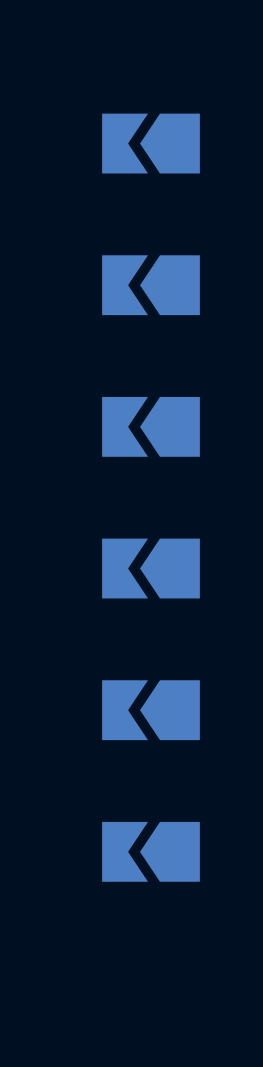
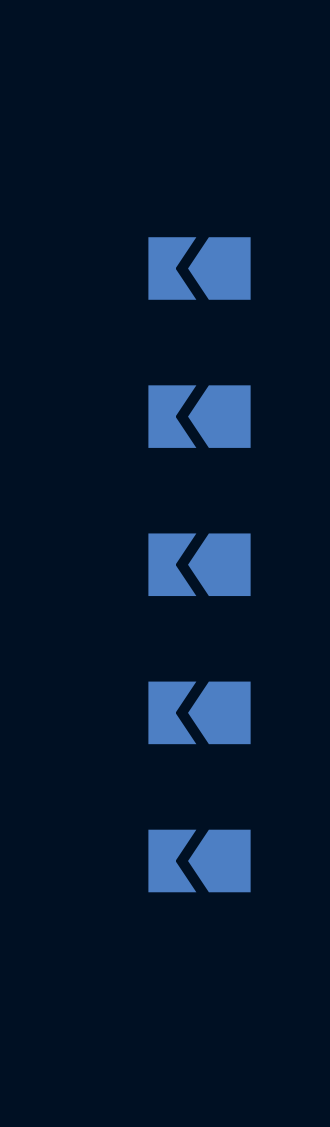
part: (151, 851) -> none

